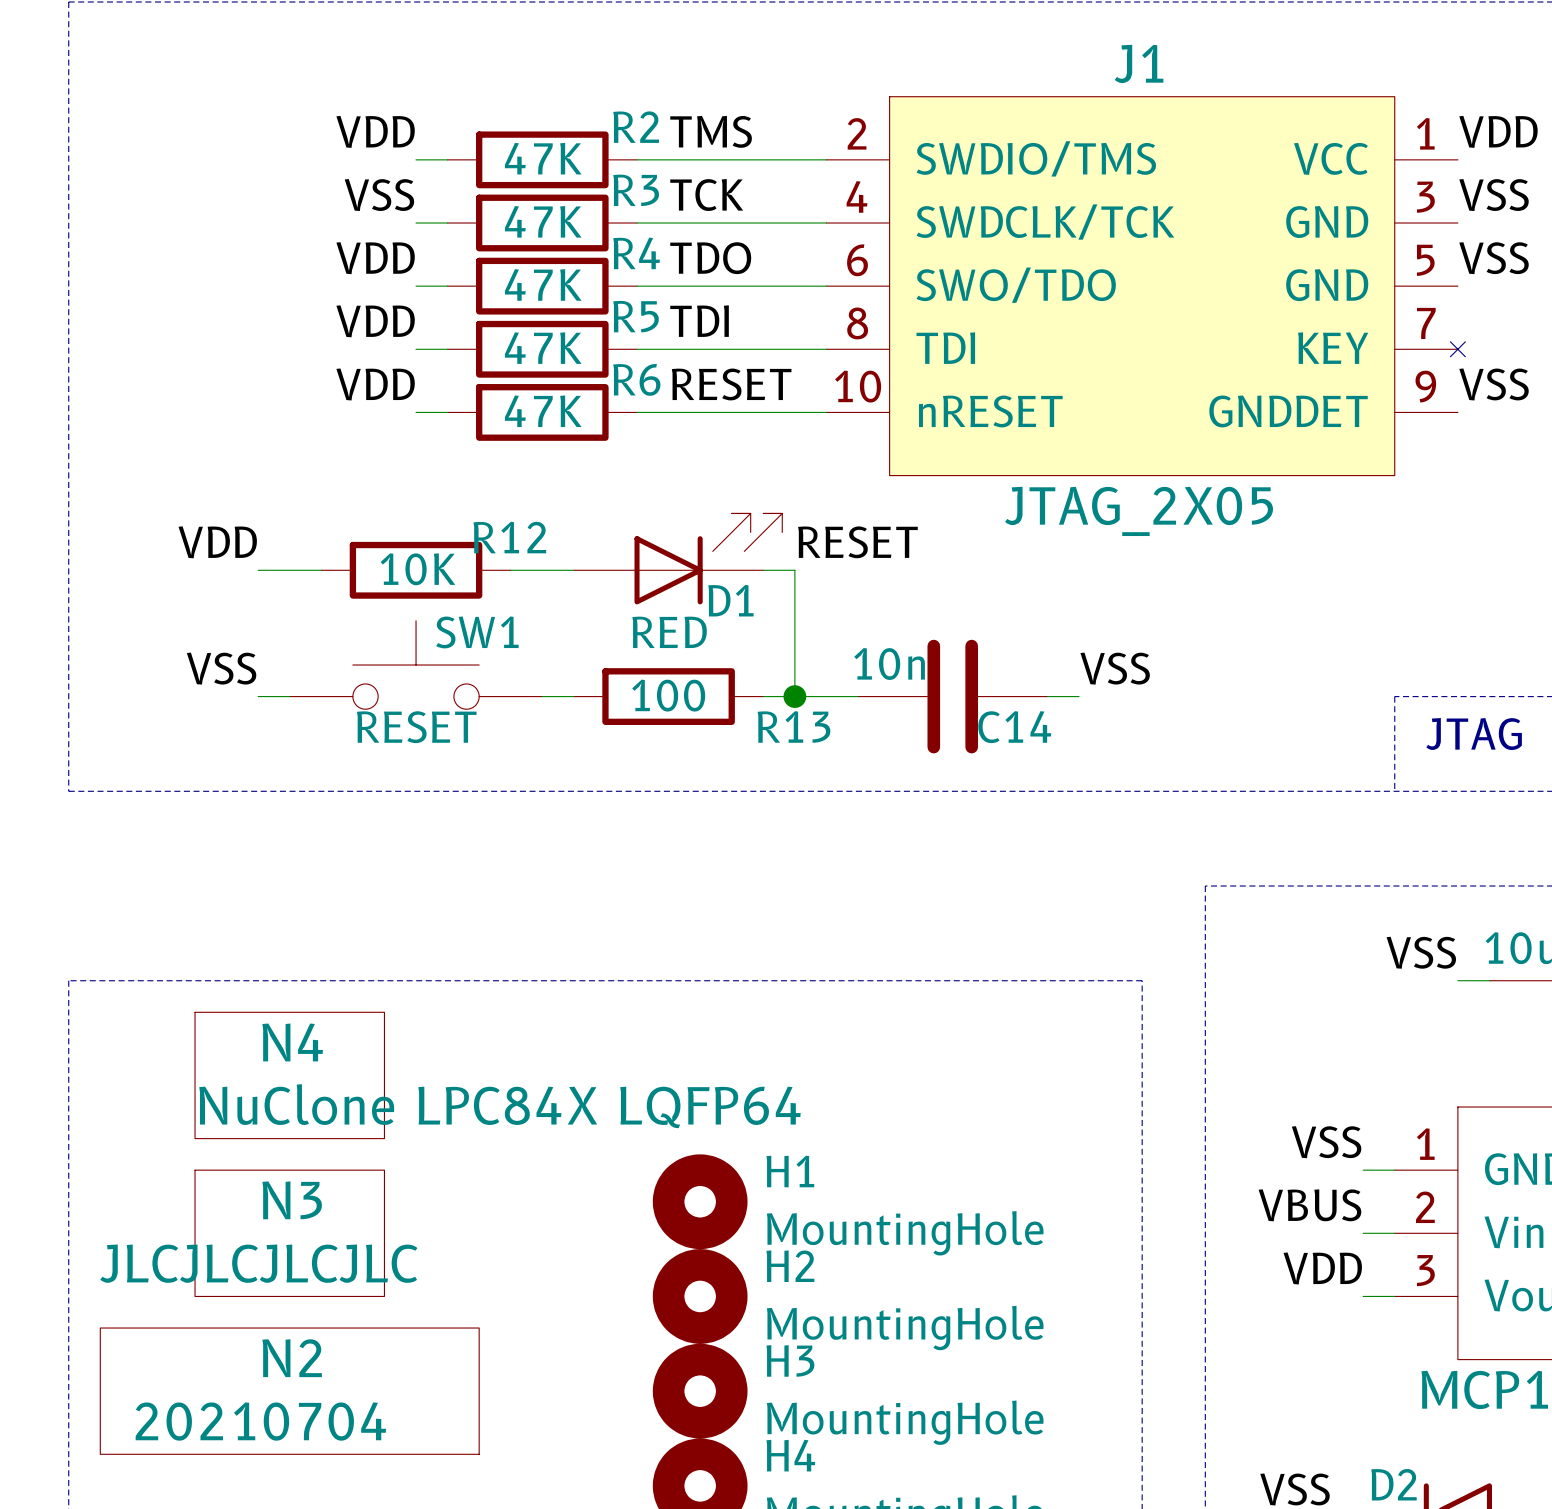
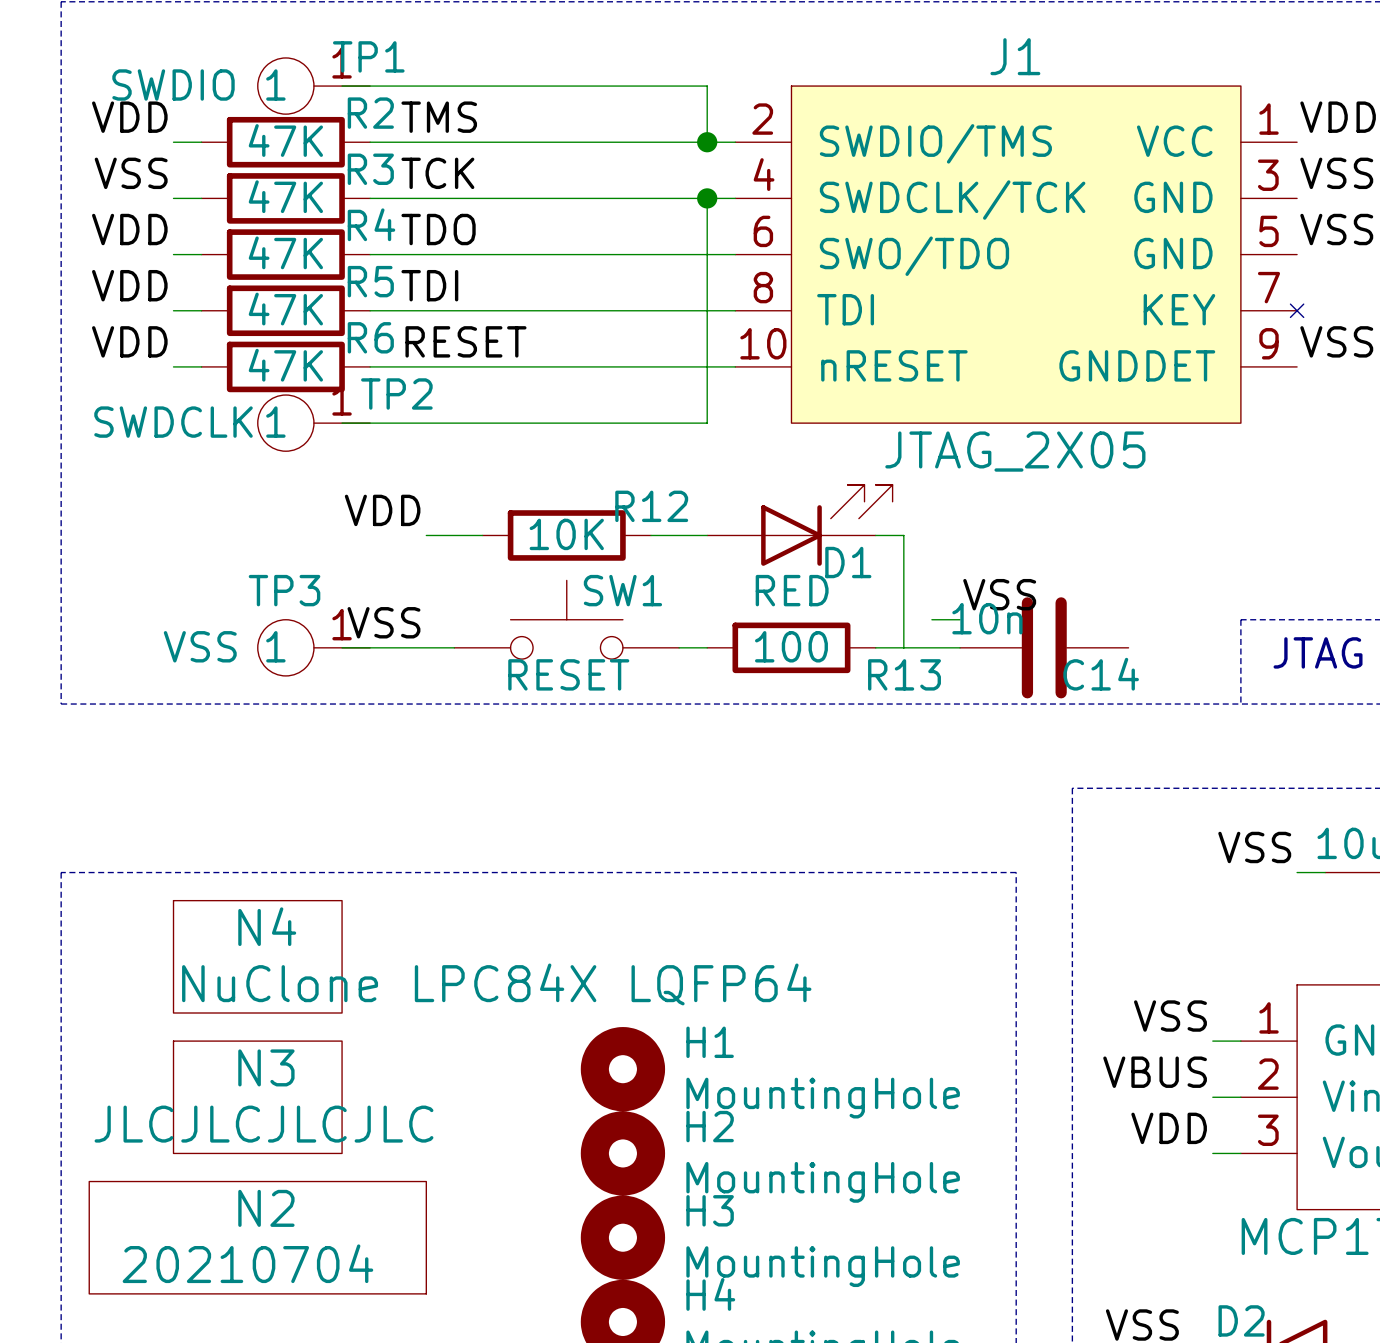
TP1: none -> SWDIO (313, 86)
wire: none -> (342, 86) (707, 86) (707, 142)
label: none -> VDD (129, 117)
label: VDD (375, 131) -> none
label position: TMS (711, 131) -> TMS (439, 117)
wire: none -> (173, 142) (201, 142)
wire: none -> (398, 142) (566, 142)
R2 position: (542, 159) -> (285, 142)
junction: none -> (707, 142)
label position: VSS (379, 195) -> VSS (131, 173)
label position: TCK (706, 195) -> TCK (437, 173)
wire: none -> (173, 198) (201, 198)
wire: none -> (398, 198) (566, 198)
R3 position: (542, 223) -> (285, 198)
wire: none -> (707, 198) (707, 423) (342, 423)
junction: none -> (707, 198)
label: none -> VDD (129, 229)
label: VDD (375, 258) -> none
label position: TDO (710, 258) -> TDO (438, 229)
wire: none -> (173, 254) (201, 254)
wire: none -> (398, 254) (566, 254)
R4 position: (542, 286) -> (285, 254)
label: none -> VDD (129, 285)
label: VDD (375, 321) -> none
label position: TDI (699, 321) -> TDI (429, 285)
wire: none -> (173, 310) (201, 310)
wire: none -> (398, 310) (566, 310)
R5 position: (542, 349) -> (285, 310)
label: none -> VDD (129, 341)
label: VDD (375, 384) -> none
label: none -> RESET (465, 341)
label: RESET (731, 384) -> none
wire: none -> (398, 366) (566, 366)
R6 position: (542, 412) -> (285, 366)
TP2: none -> SWDCLK (313, 423)
label: VDD (217, 542) -> none
label: RESET (857, 542) -> none
D1 position: (678, 558) -> (799, 525)
wire: (258, 570) (321, 570) -> (426, 535) (482, 535)
R12 position: (416, 570) -> (566, 535)
wire: (510, 570) (573, 570) -> (651, 535) (707, 535)
wire: (763, 570) (794, 570) (794, 696) -> (875, 535) (903, 535) (903, 647)
label: none -> VDD (382, 510)
SW1 position: (416, 665) -> (566, 619)
label position: VSS (221, 668) -> VSS (383, 622)
wire: (258, 696) (289, 696) -> (173, 366) (201, 366)
wire: (542, 696) (573, 696) -> (679, 647) (707, 647)
R13 position: (668, 696) -> (791, 647)
wire: (763, 696) (858, 696) -> (875, 647) (960, 647)
junction: (794, 696) -> none
C14 position: (952, 696) -> (1044, 647)
TP3: none -> VSS (313, 647)
wire: none -> (342, 647) (454, 647)

